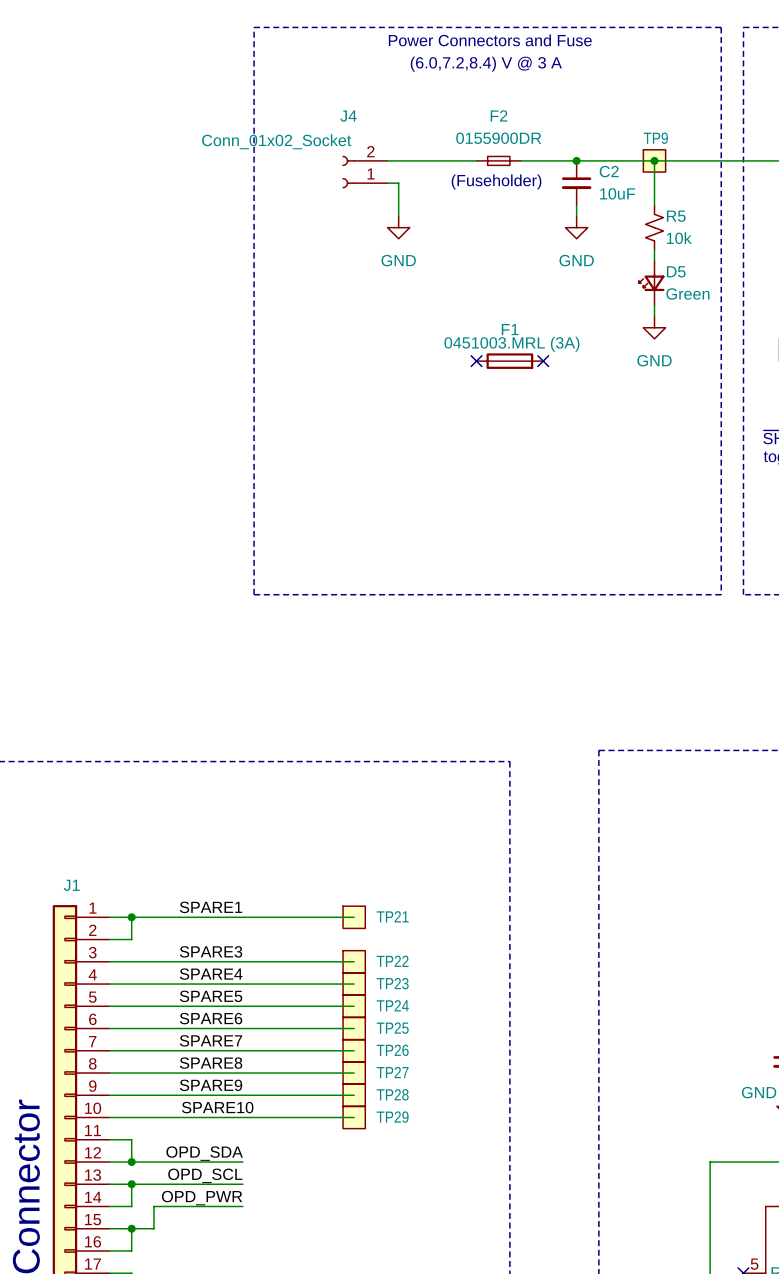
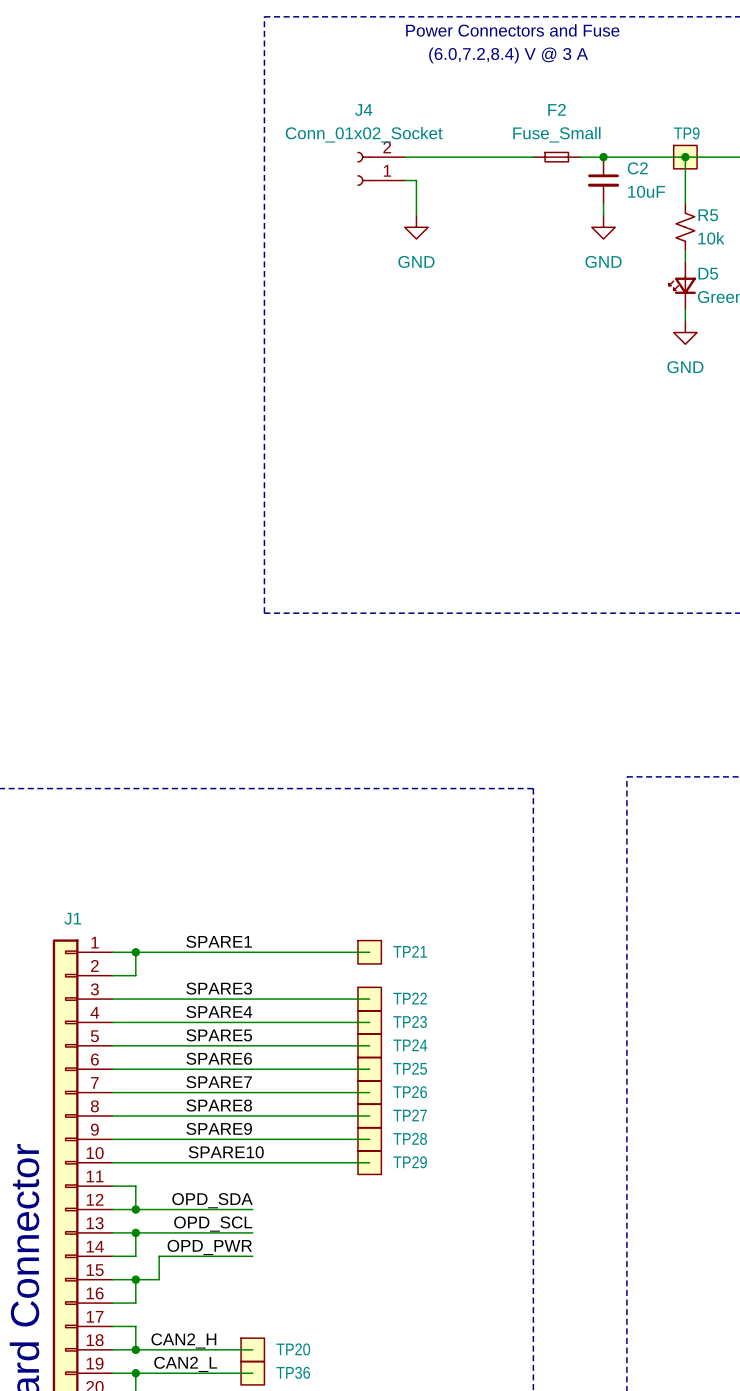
F2 value: 0155900DR (498, 138) -> Fuse_Small (556, 134)
J4 value position: Conn_01x02_Socket (276, 141) -> Conn_01x02_Socket (364, 134)
F2 position: (498, 160) -> (556, 157)
text: (Fuseholder) (496, 181) -> none
no-connect mark: (476, 361) -> none
F1: 0451003.MRL (3A) (509, 361) -> none
no-connect mark: (543, 361) -> none

